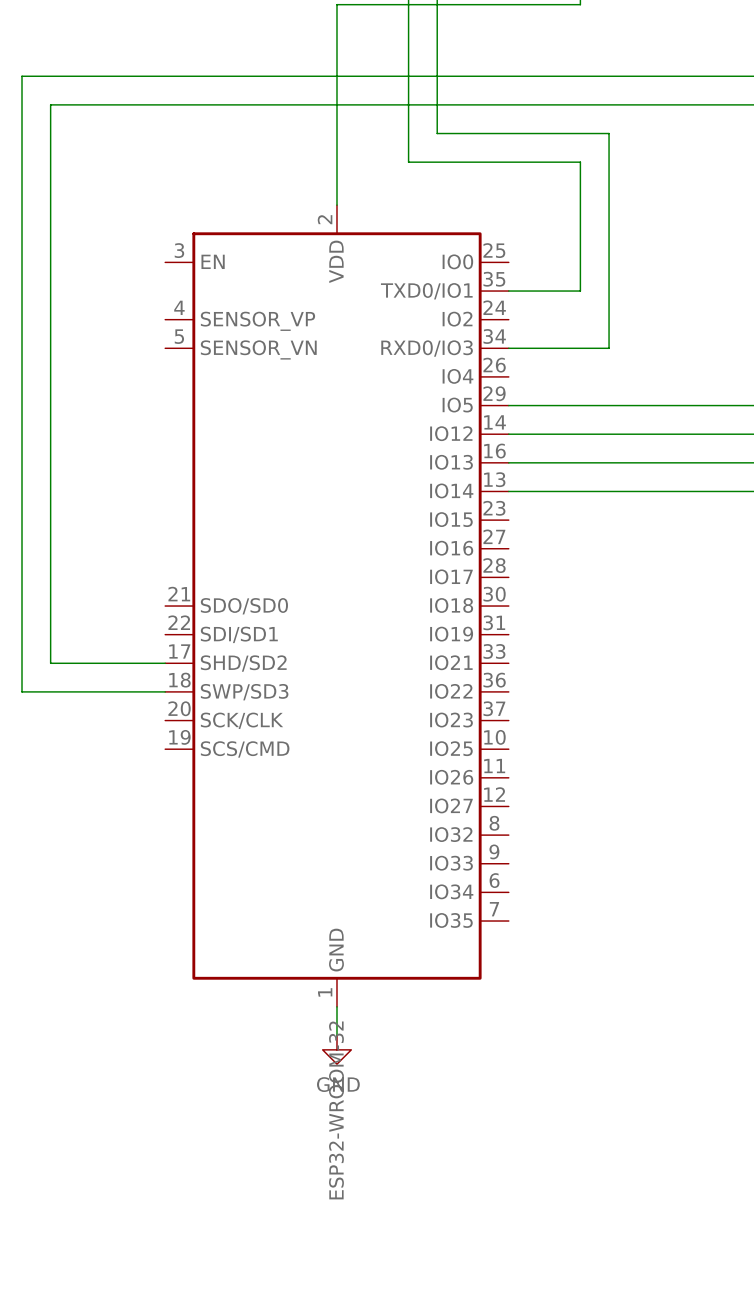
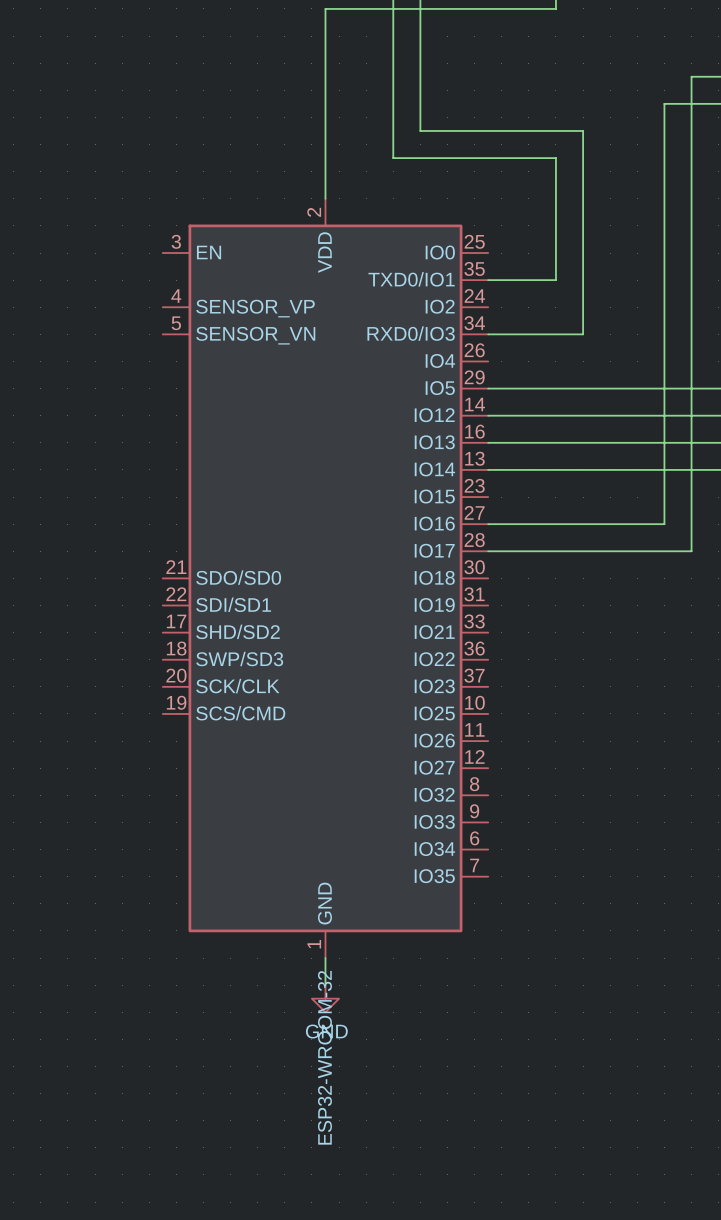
wire: (723, 76) (22, 76) (22, 691) (165, 691) -> (691, 76) (691, 551) (488, 551)
wire: (694, 104) (50, 104) (50, 663) (165, 663) -> (664, 103) (664, 524) (488, 524)

